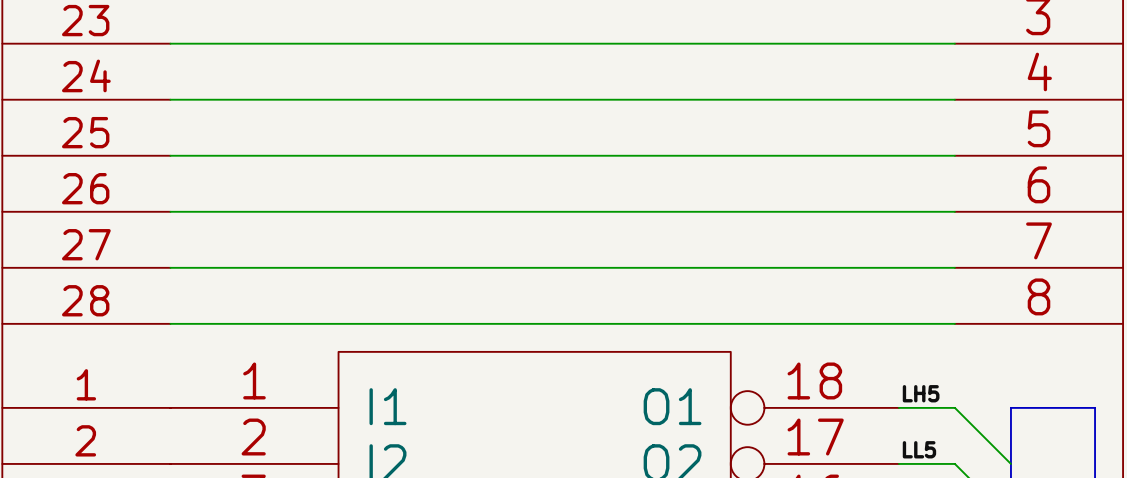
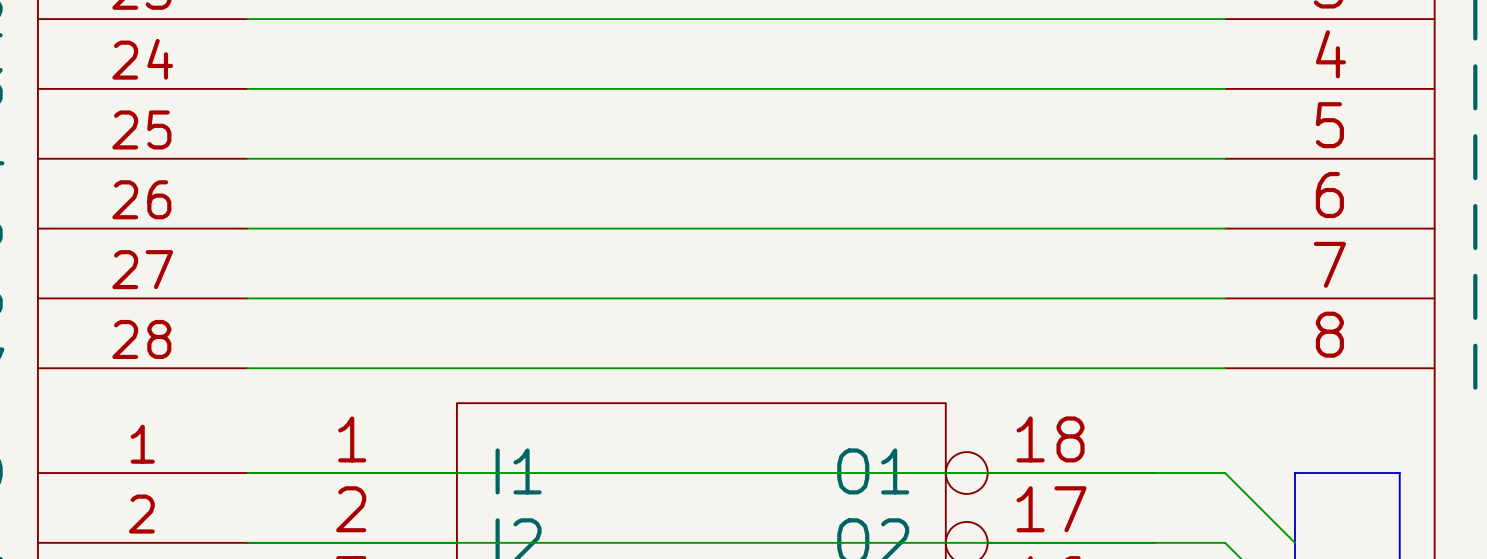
label: LH5 (921, 393) -> none
wire: none -> (247, 473) (1155, 473)
label: LL5 (919, 449) -> none
wire: none -> (247, 542) (1155, 542)

